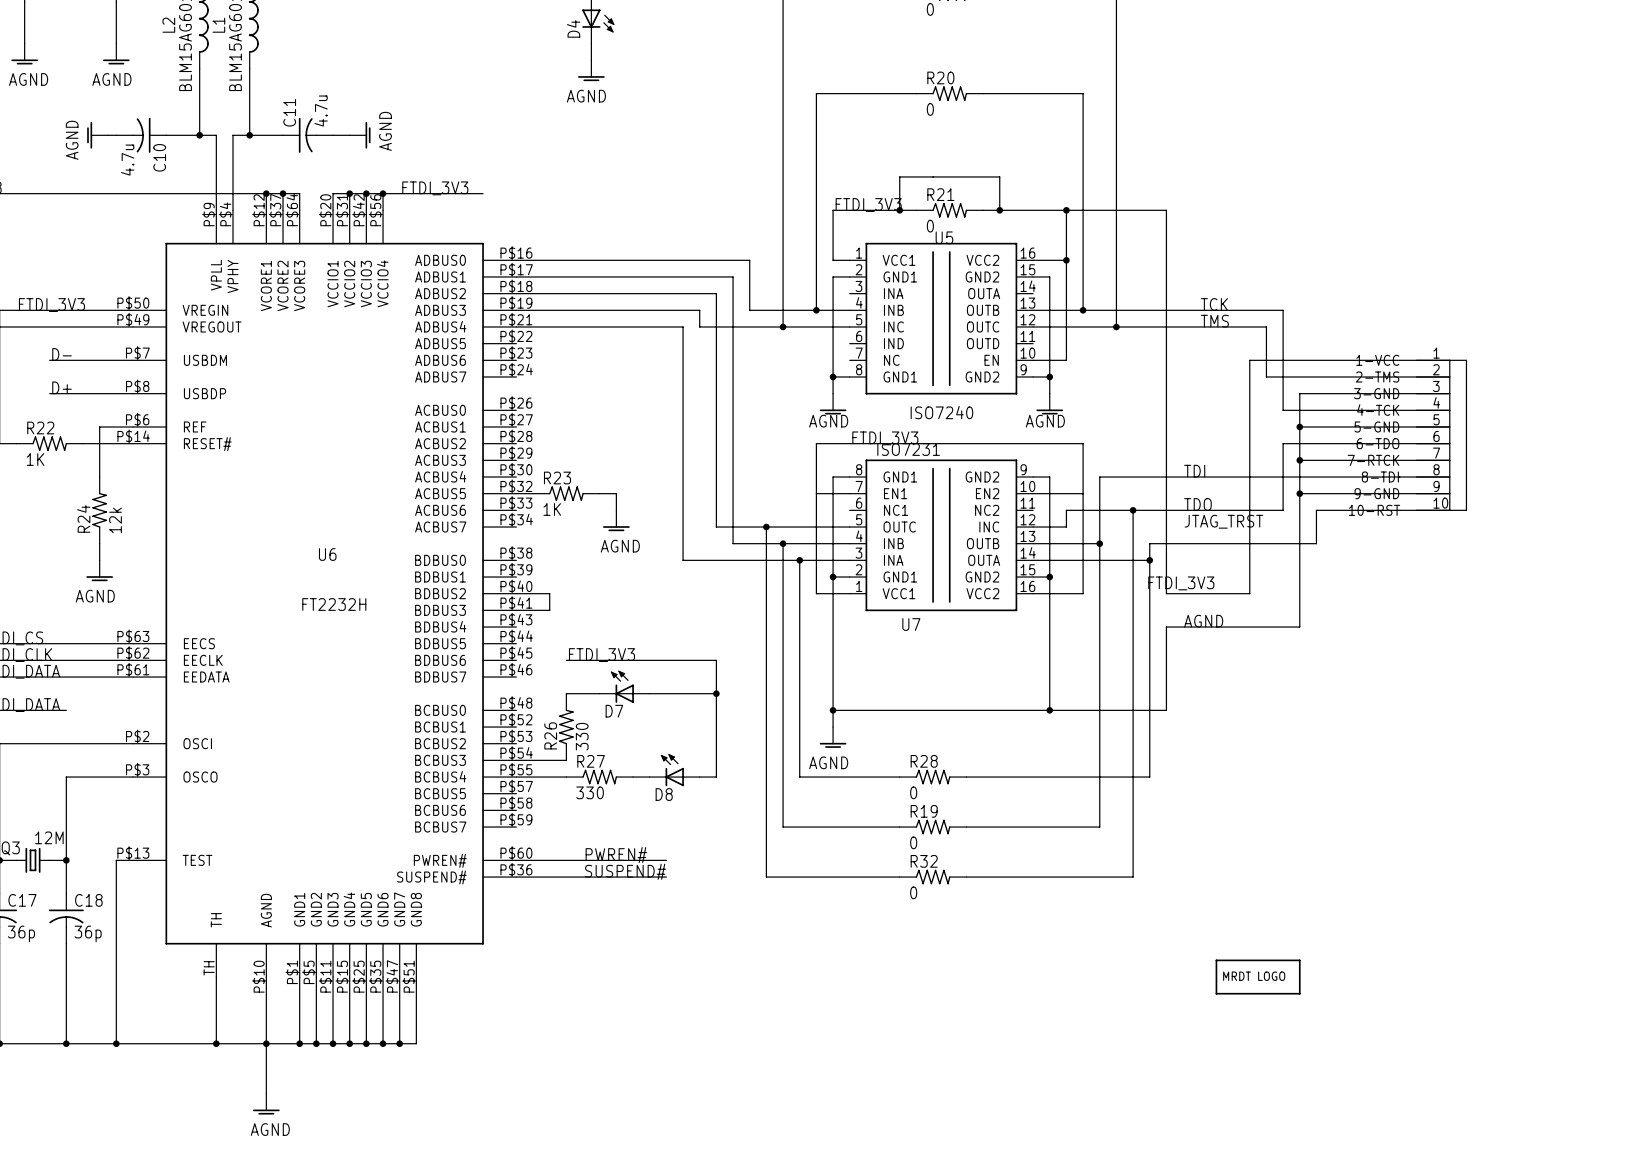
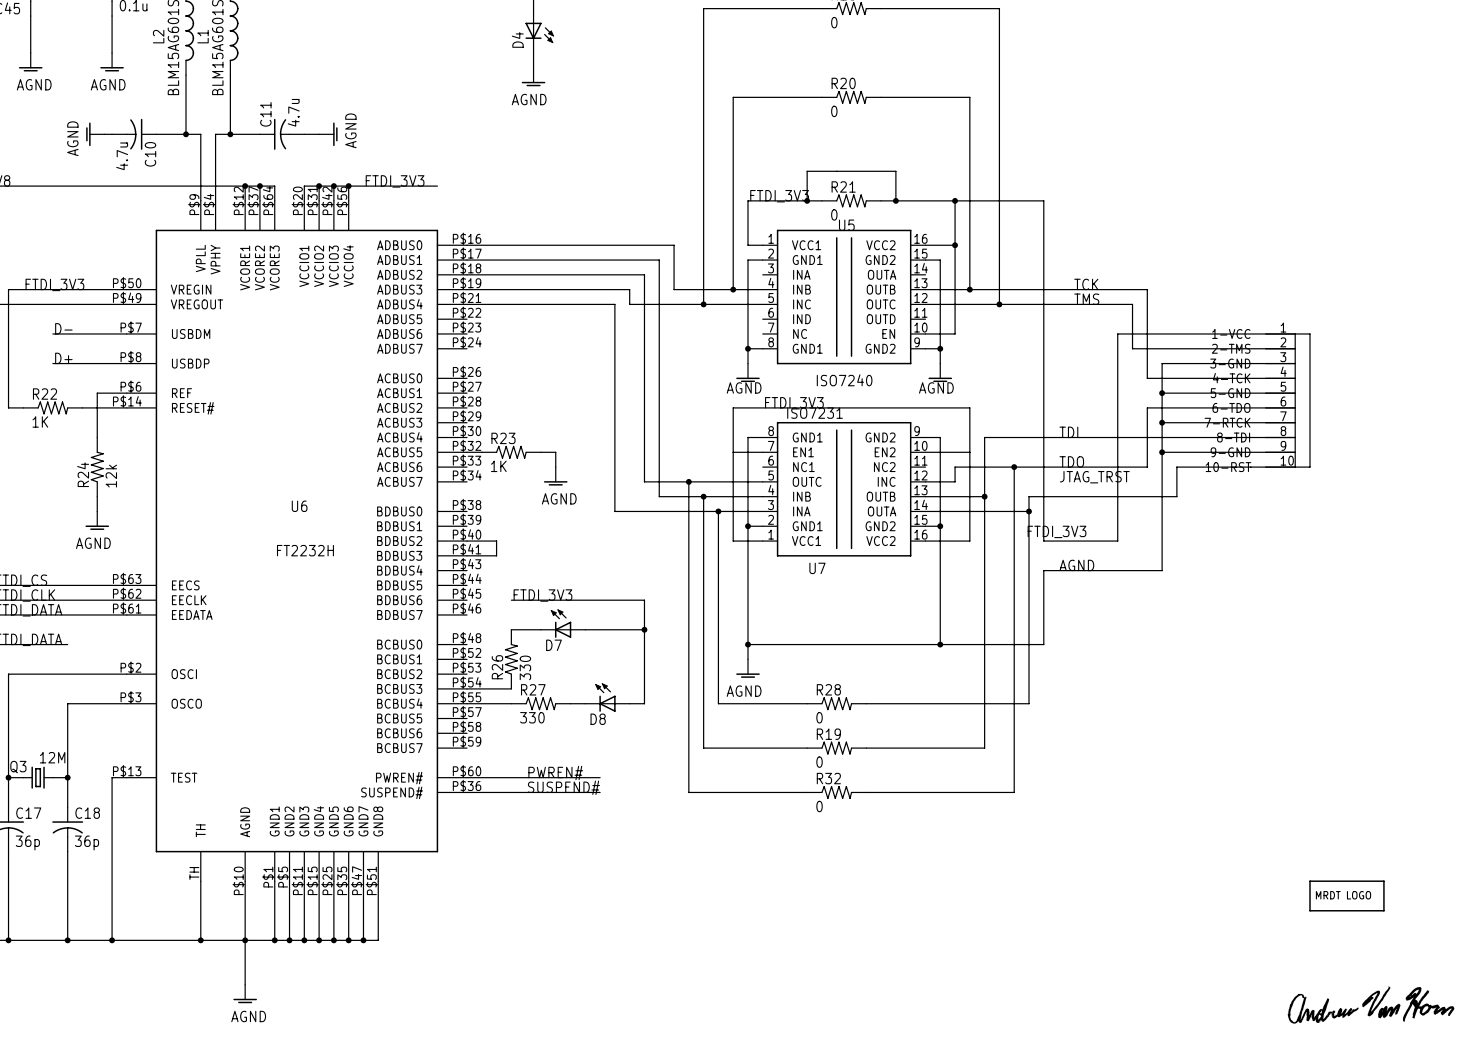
part: (1258, 977) -> none
part: none -> (1346, 895)
part: none -> (1371, 1004)

